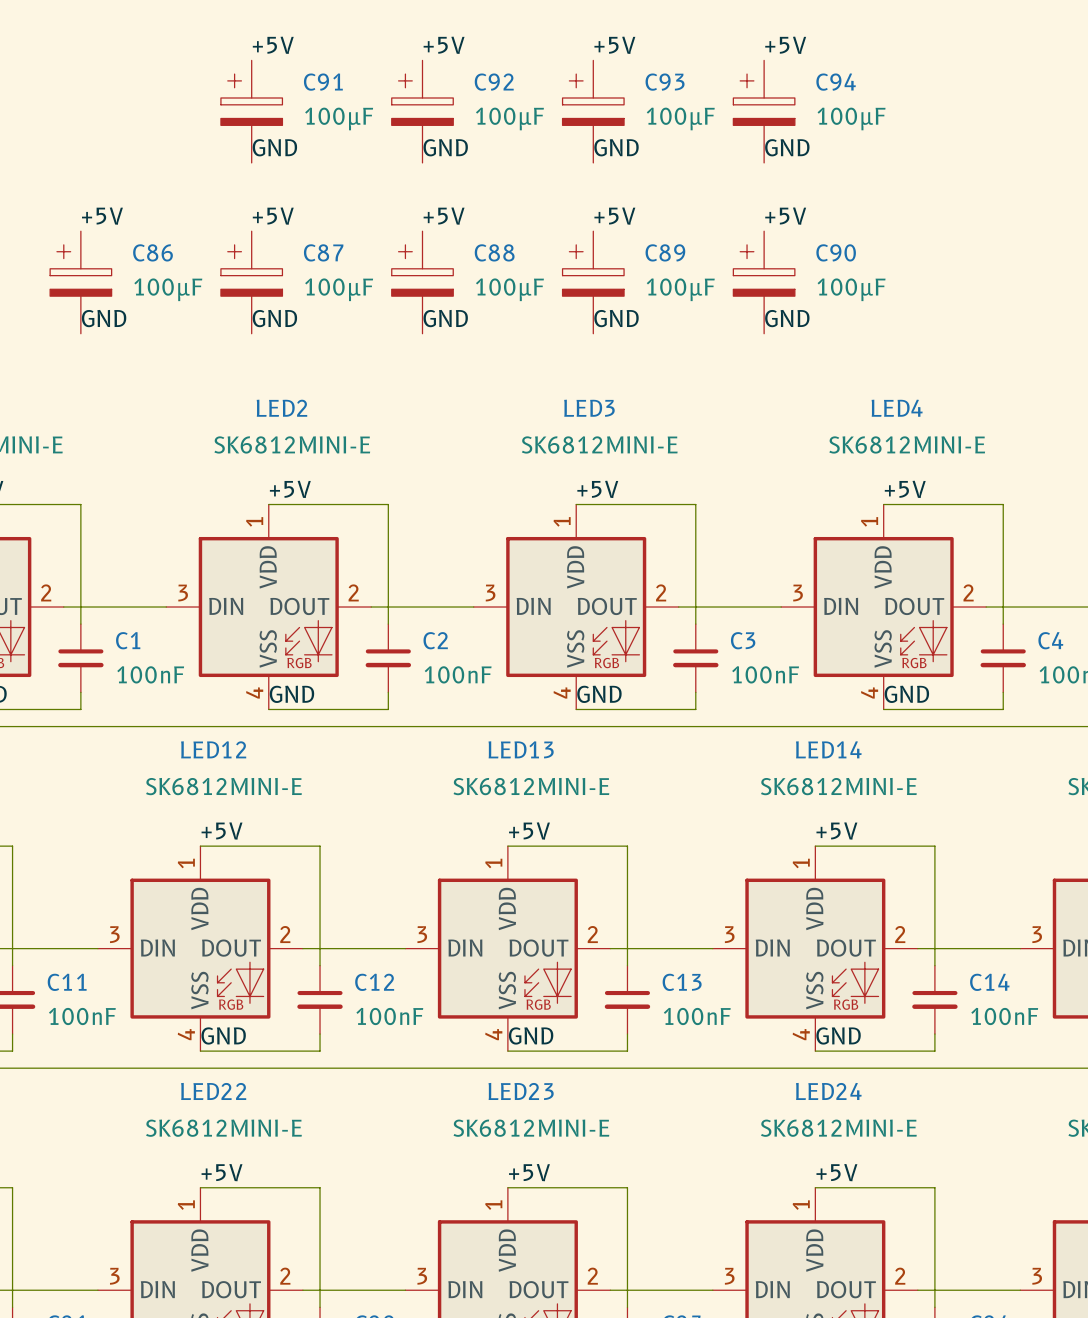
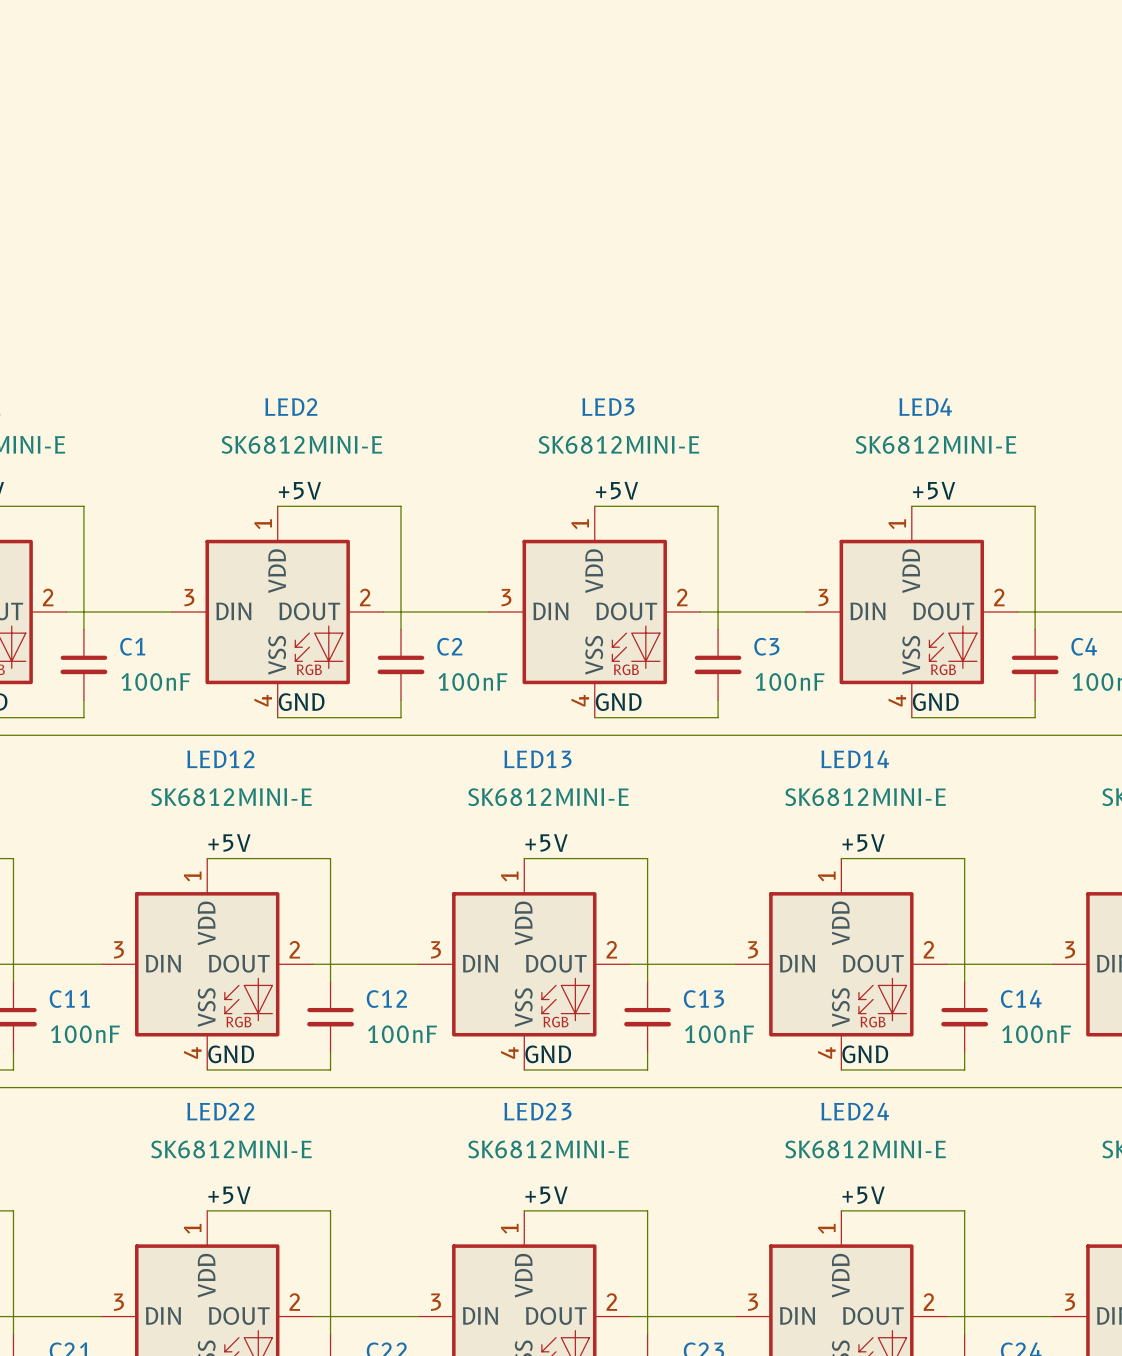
label: +5V (273, 45) -> none
label: +5V (444, 45) -> none
label: +5V (614, 45) -> none
label: +5V (785, 45) -> none
C91: 100µF (251, 111) -> none
C92: 100µF (422, 111) -> none
C93: 100µF (593, 111) -> none
C94: 100µF (764, 111) -> none
label: GND (274, 147) -> none
label: GND (445, 147) -> none
label: GND (616, 147) -> none
label: GND (787, 147) -> none
label: +5V (102, 216) -> none
label: +5V (273, 216) -> none
label: +5V (444, 216) -> none
label: +5V (614, 216) -> none
label: +5V (785, 216) -> none
C86: 100µF (80, 282) -> none
C87: 100µF (251, 282) -> none
C88: 100µF (422, 282) -> none
C89: 100µF (593, 282) -> none
C90: 100µF (764, 282) -> none
label: GND (104, 318) -> none
label: GND (274, 318) -> none
label: GND (445, 318) -> none
label: GND (616, 318) -> none
label: GND (787, 318) -> none

